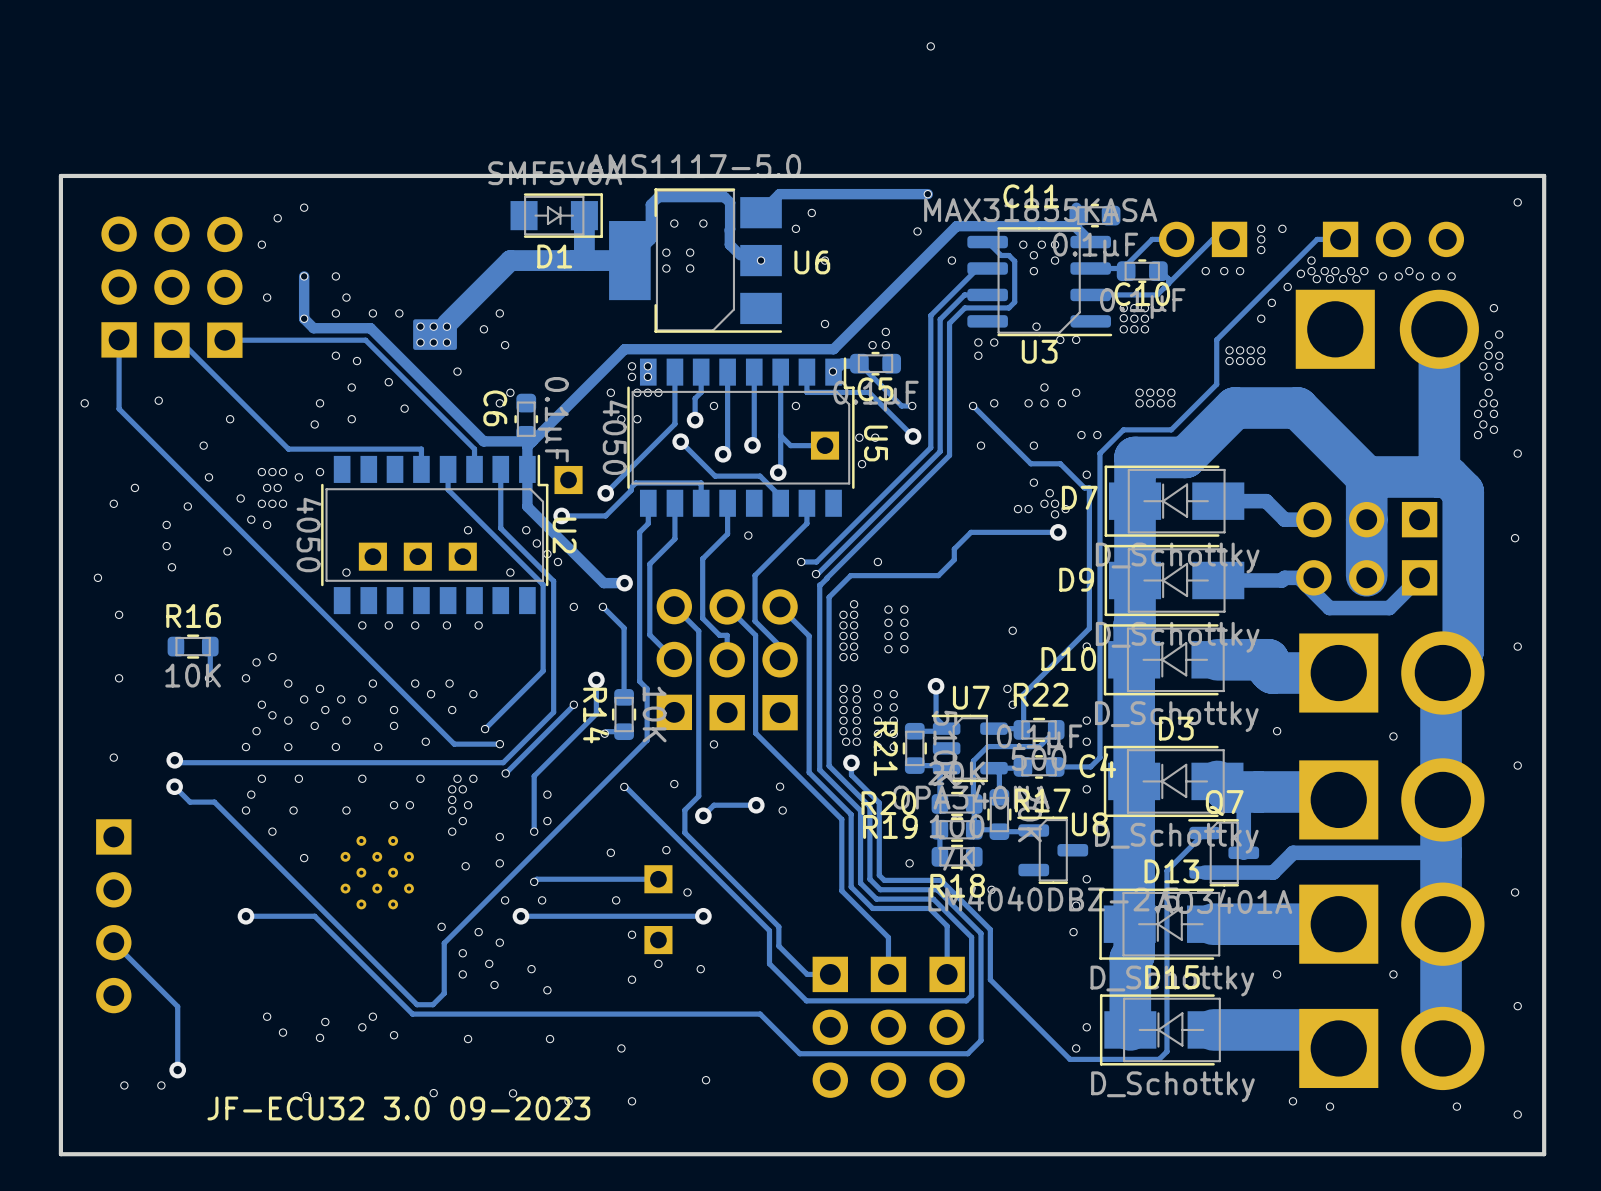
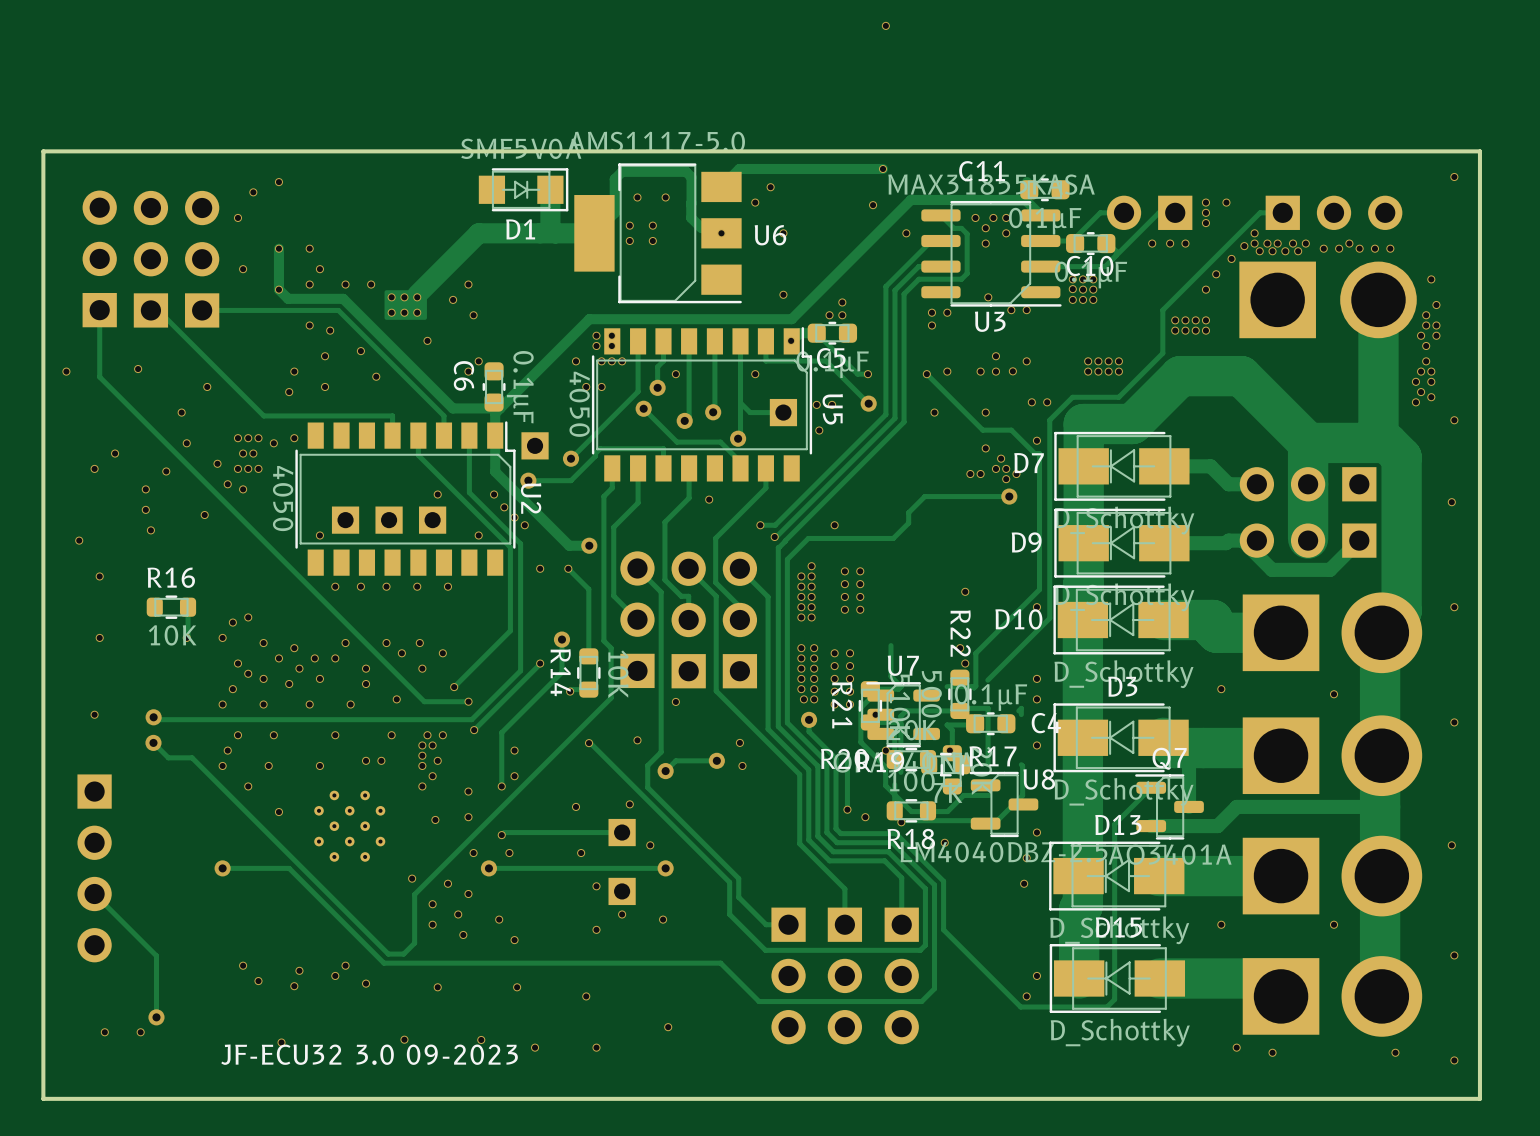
track: (1099, 658) (1099, 757) (1090, 766) (1055, 766) -> (1049, 618) (987, 680)
via: (936, 686) -> none
R22 rotation: 0° (1039, 729) -> 90° clockwise (959, 694)
R22 position: (1039, 729) -> (959, 694)
track: (1056, 729) (1039, 746) (987, 746) (973, 760) (974, 829) (997, 829) (999, 831) (1033, 830) -> none
track: none -> (880, 695) (873, 695) (860, 707) (860, 742) (885, 767) (885, 785) (911, 811) (947, 811) (963, 795) (989, 795)
U7 position: (969, 748) -> (903, 714)
track: none -> (1018, 710) (1021, 708) (1021, 714)
via: none -> (875, 714)
via: none -> (885, 750)
via: none -> (949, 750)
track: none -> (847, 760) (847, 809)
track: none -> (988, 764) (988, 708) (962, 708) (959, 710) (906, 710) (900, 716) (900, 772)
track: none -> (1021, 764) (1022, 795) (997, 820) (903, 820) (901, 822)
R19 position: (957, 829) -> (945, 764)
via: none -> (847, 809)
via: none -> (901, 822)

